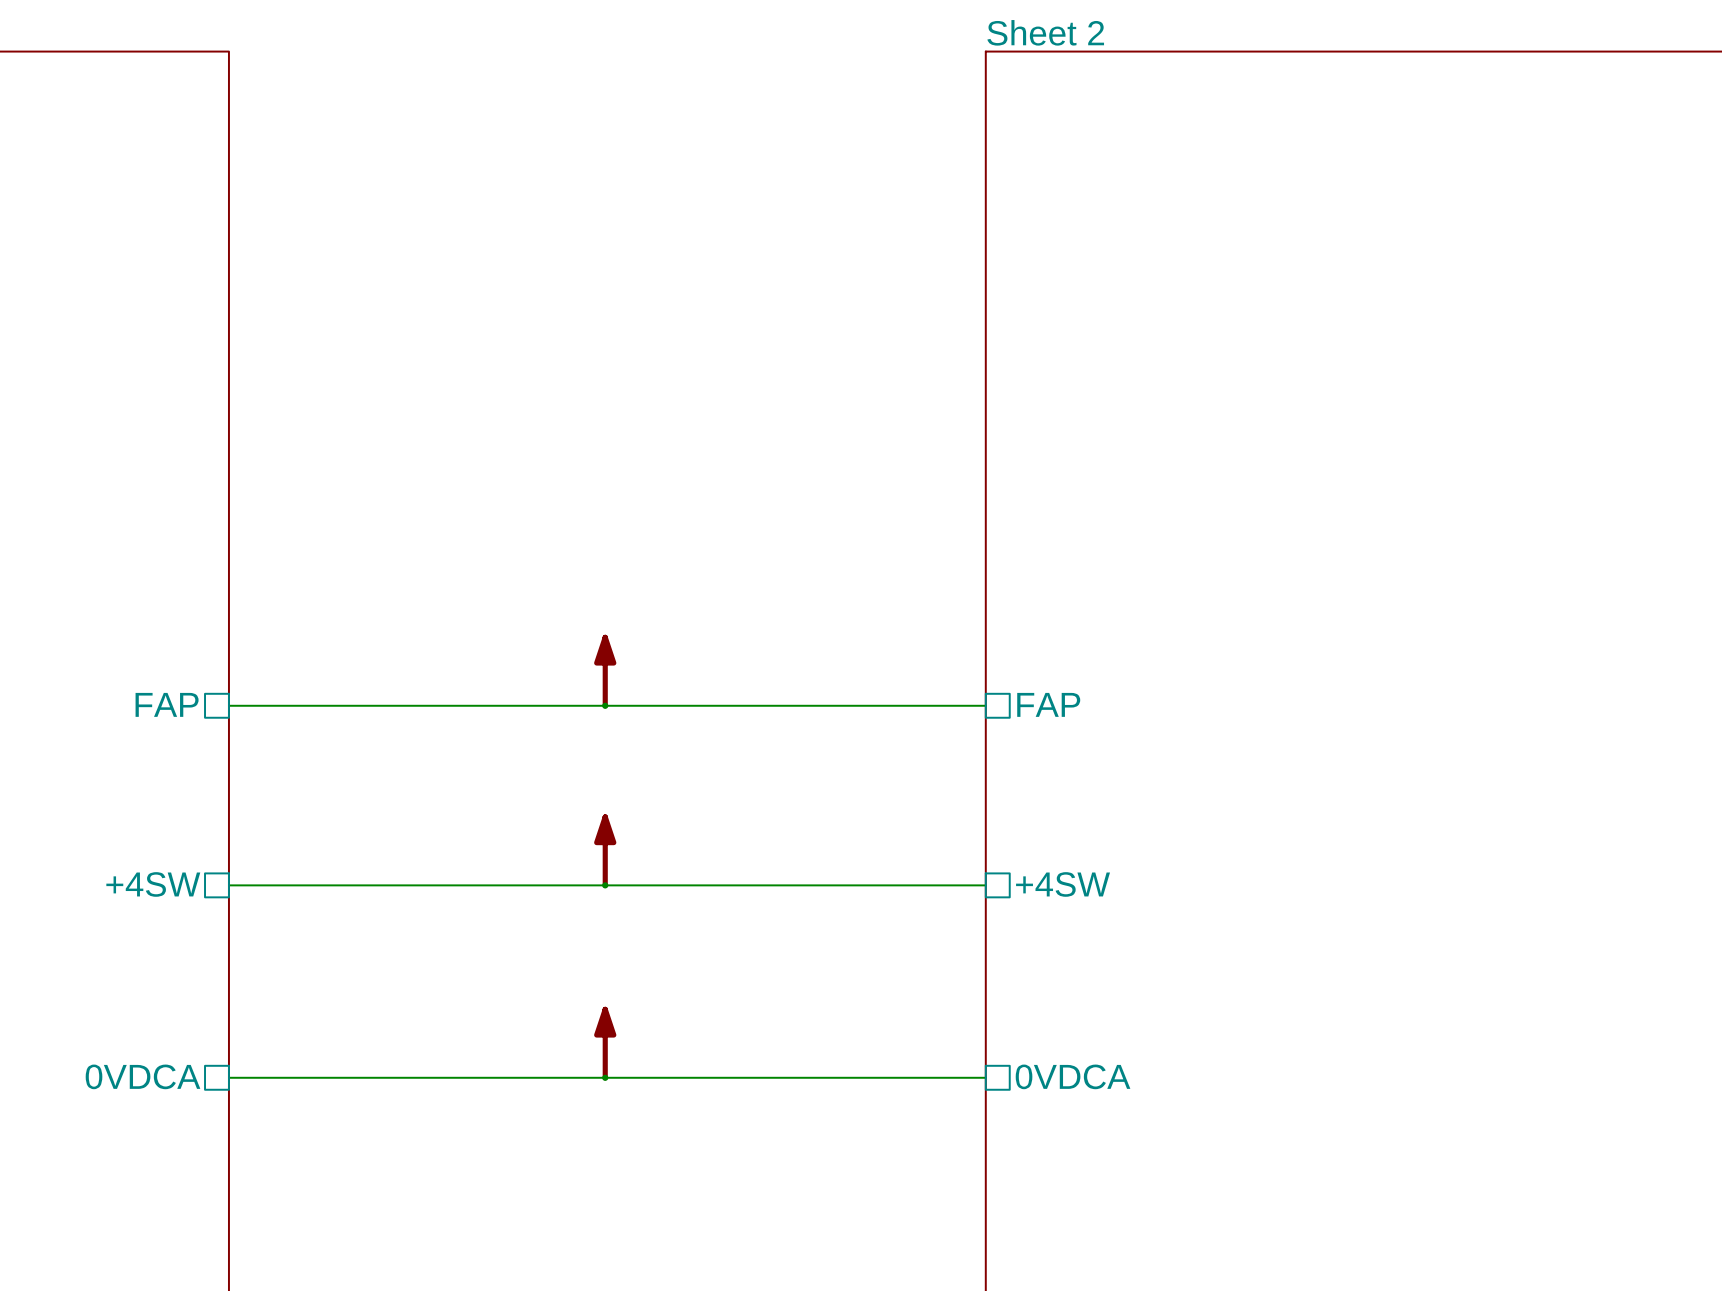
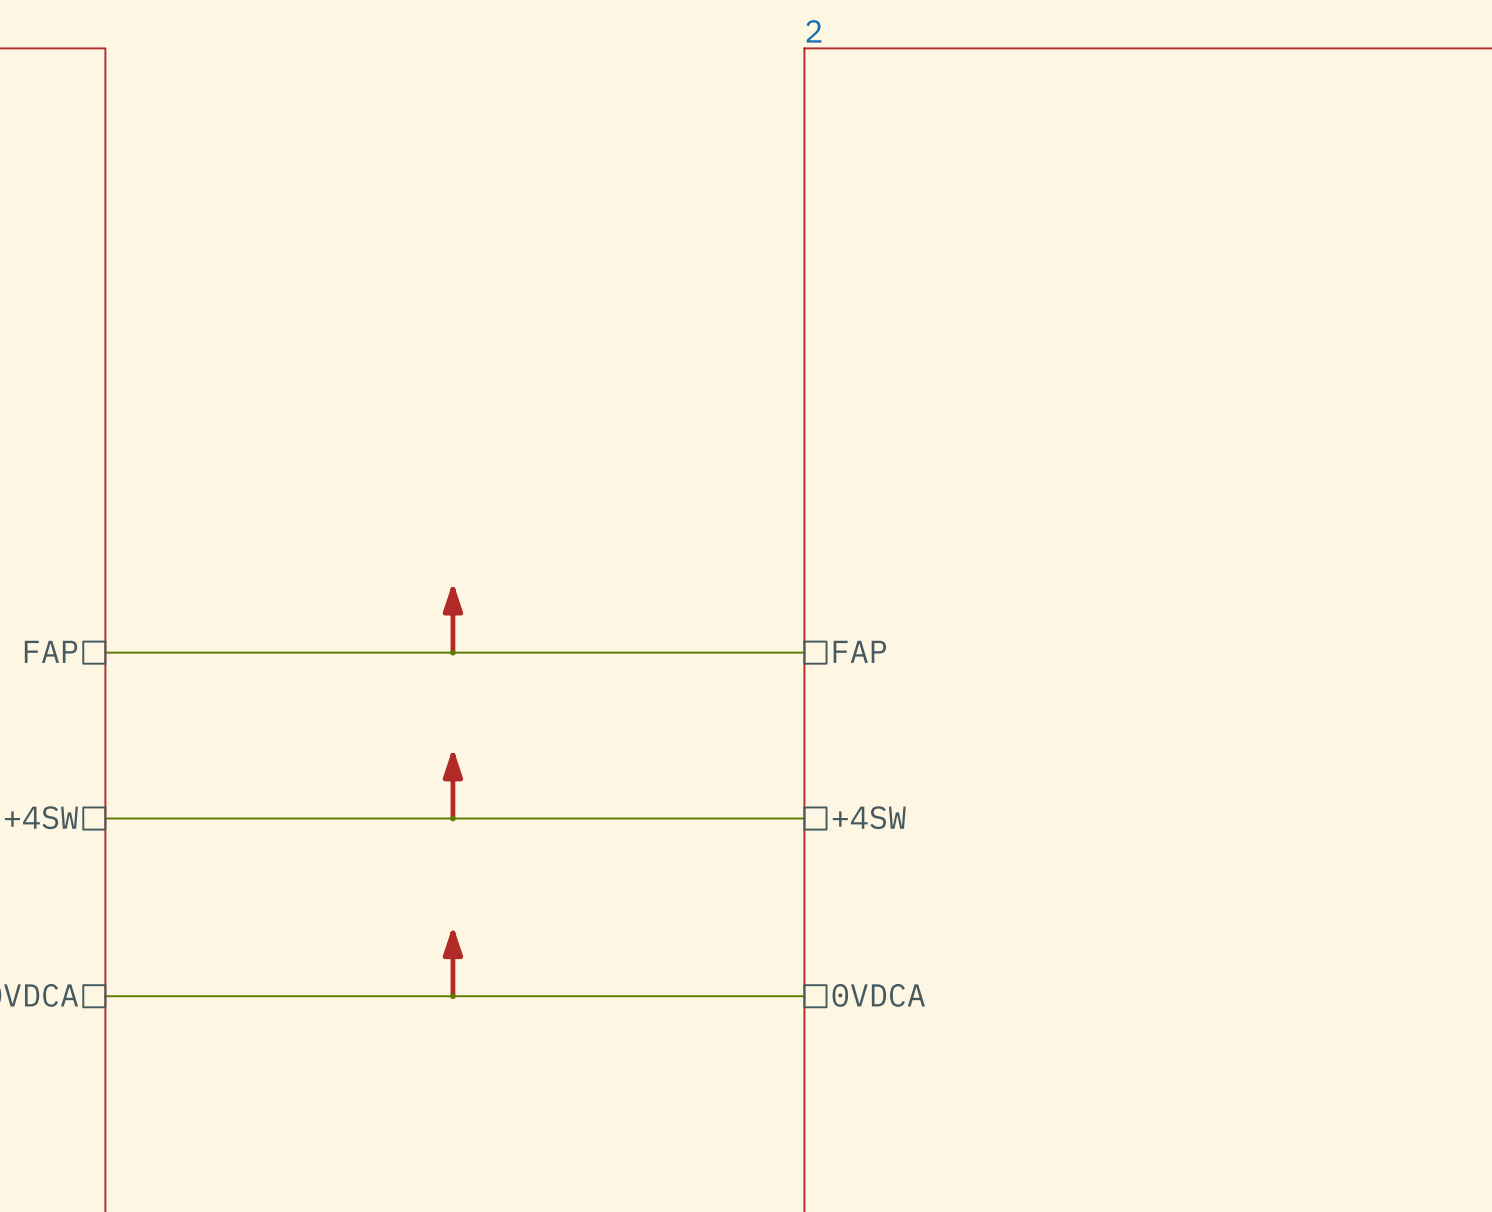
sheet Sheet 2 name: Sheet 2 (1045, 32) -> 2 (813, 31)

